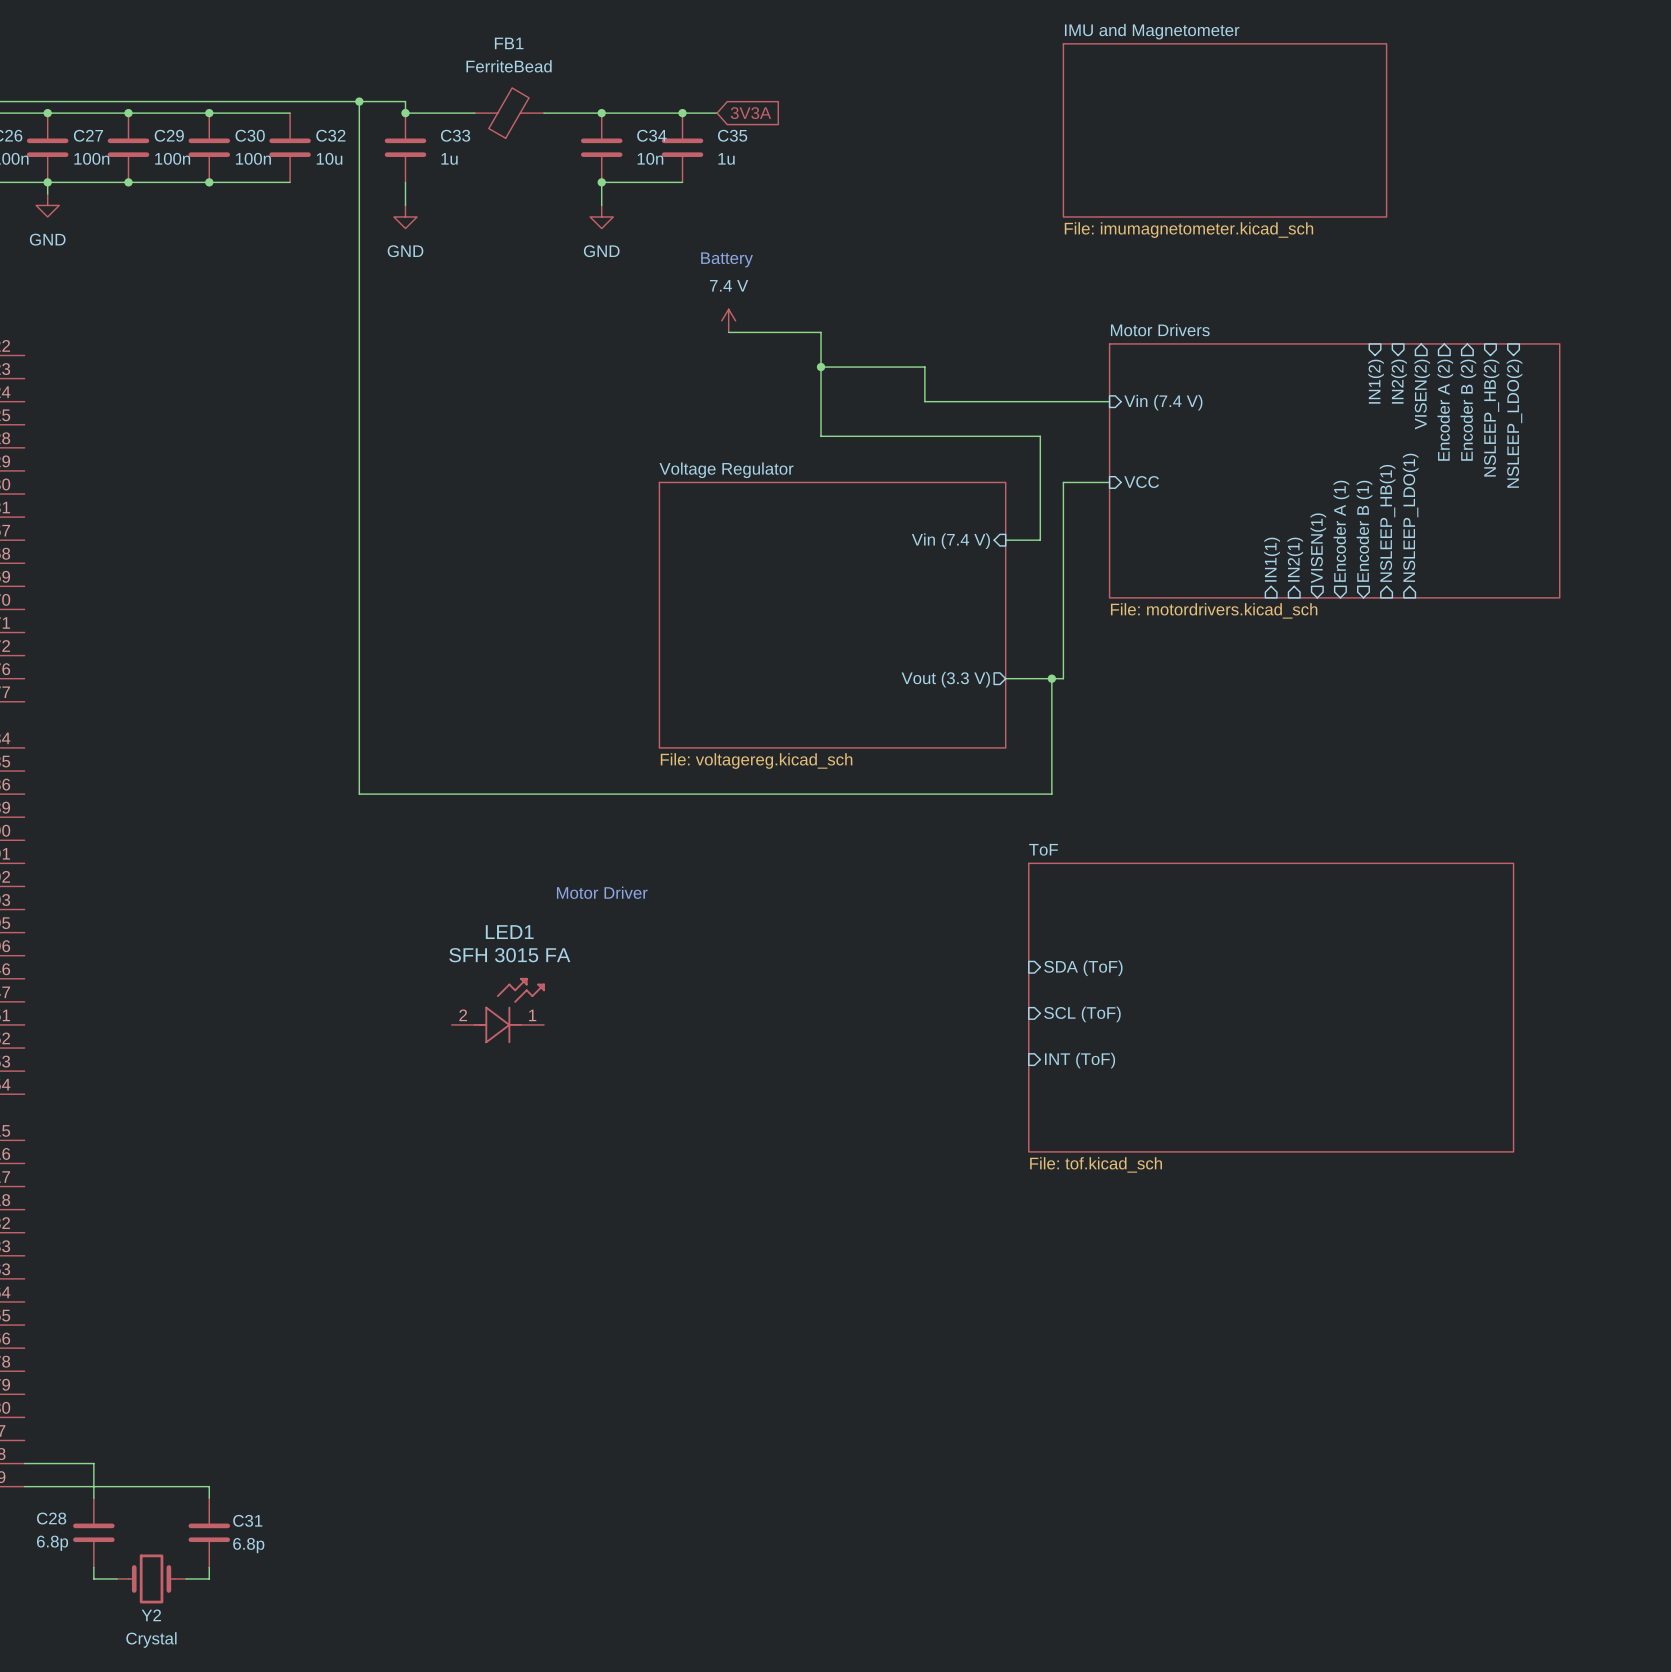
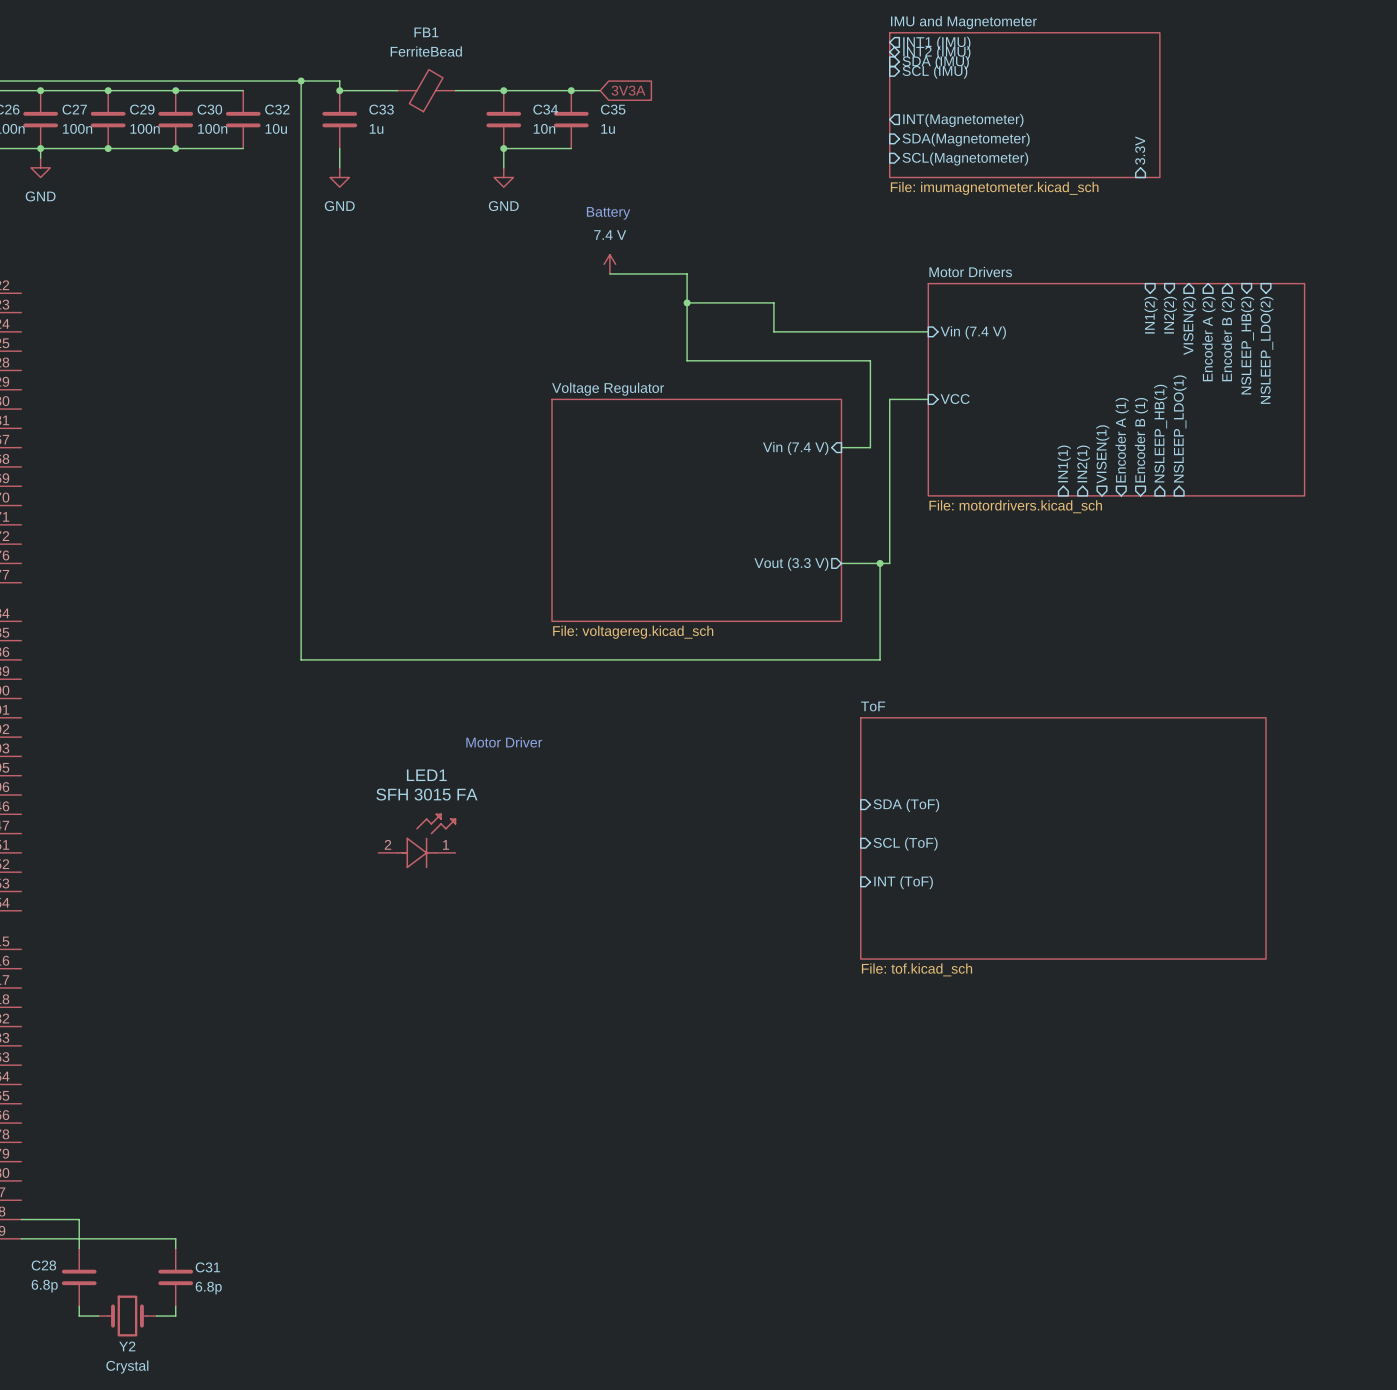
sheet pin: none -> INT1 (IMU) (936, 43)
sheet pin: none -> INT2 (IMU) (936, 52)
sheet pin: none -> SDA (IMU) (935, 62)
sheet pin: none -> SCL (IMU) (934, 72)
sheet pin: none -> INT(Magnetometer) (963, 120)
sheet pin: none -> SDA(Magnetometer) (966, 139)
sheet pin: none -> 3.3V (1140, 150)
sheet pin: none -> SCL(Magnetometer) (965, 159)

